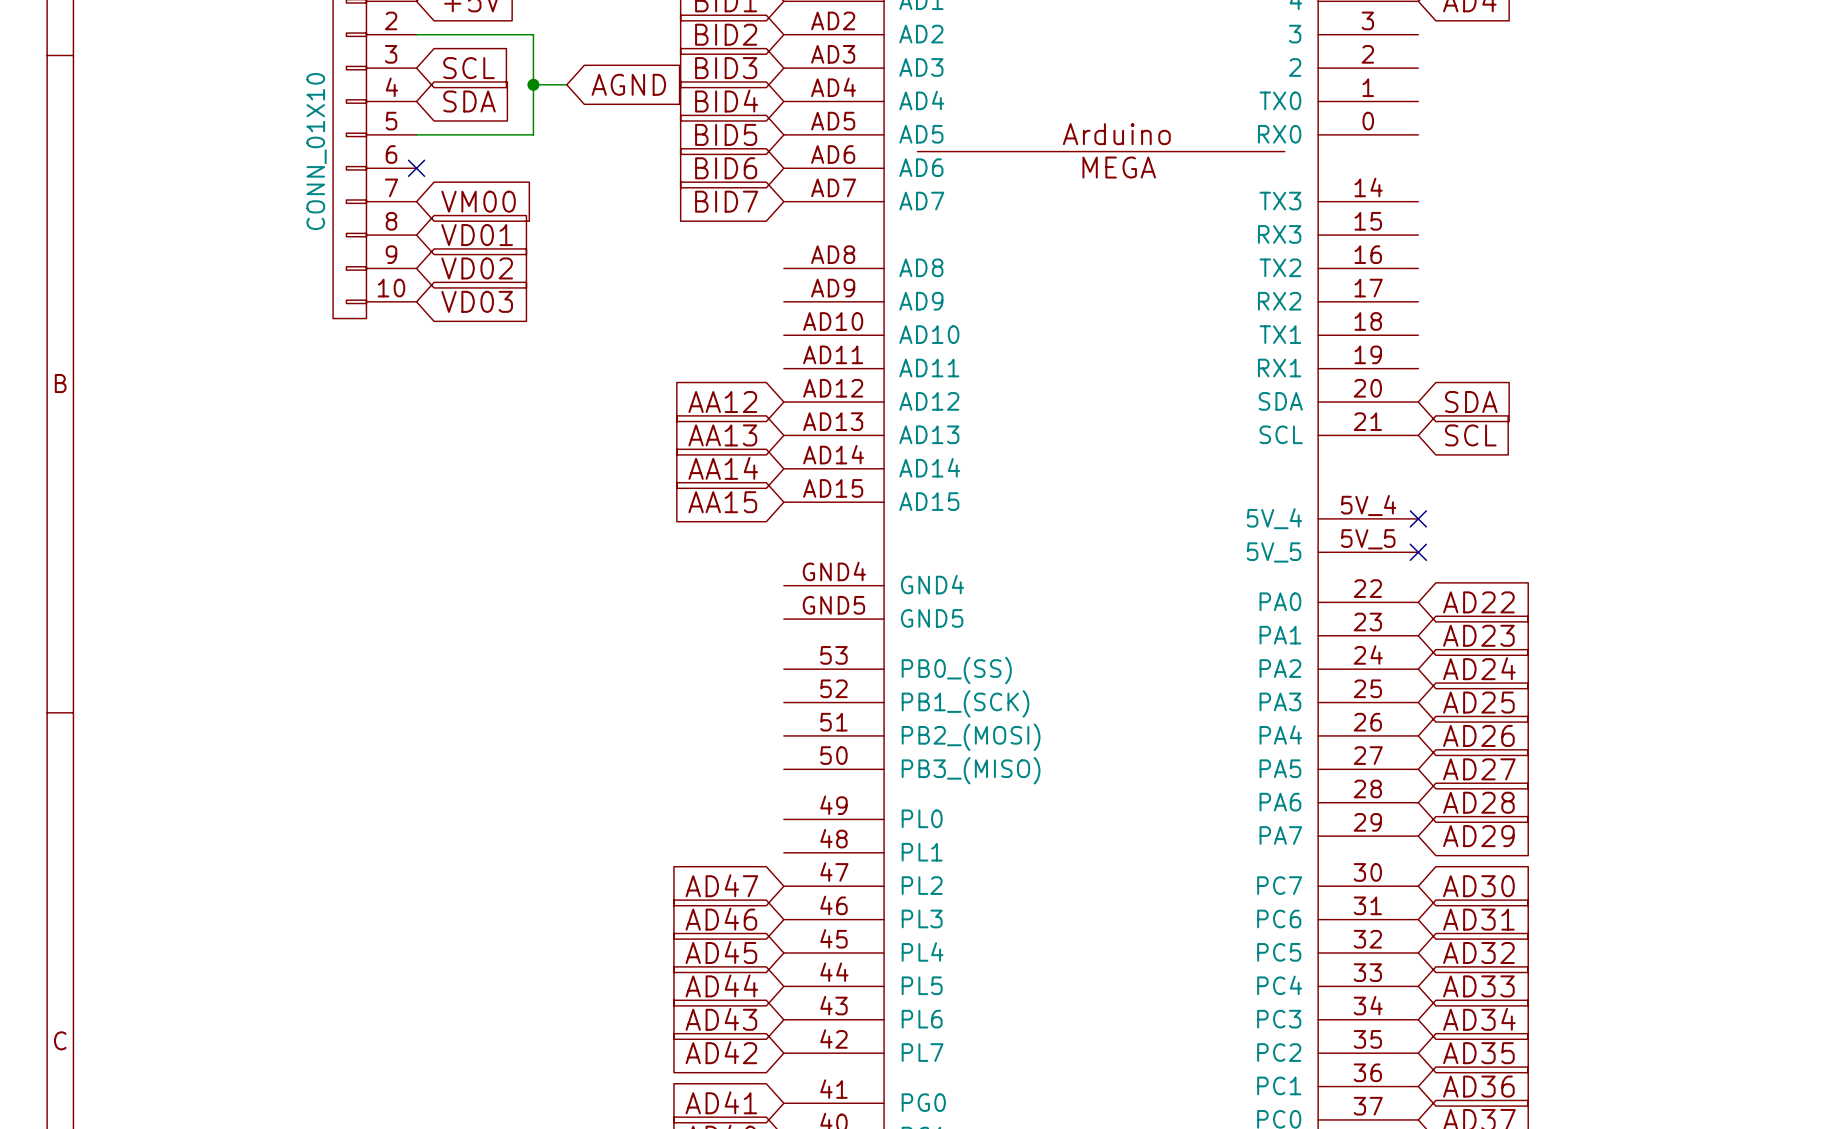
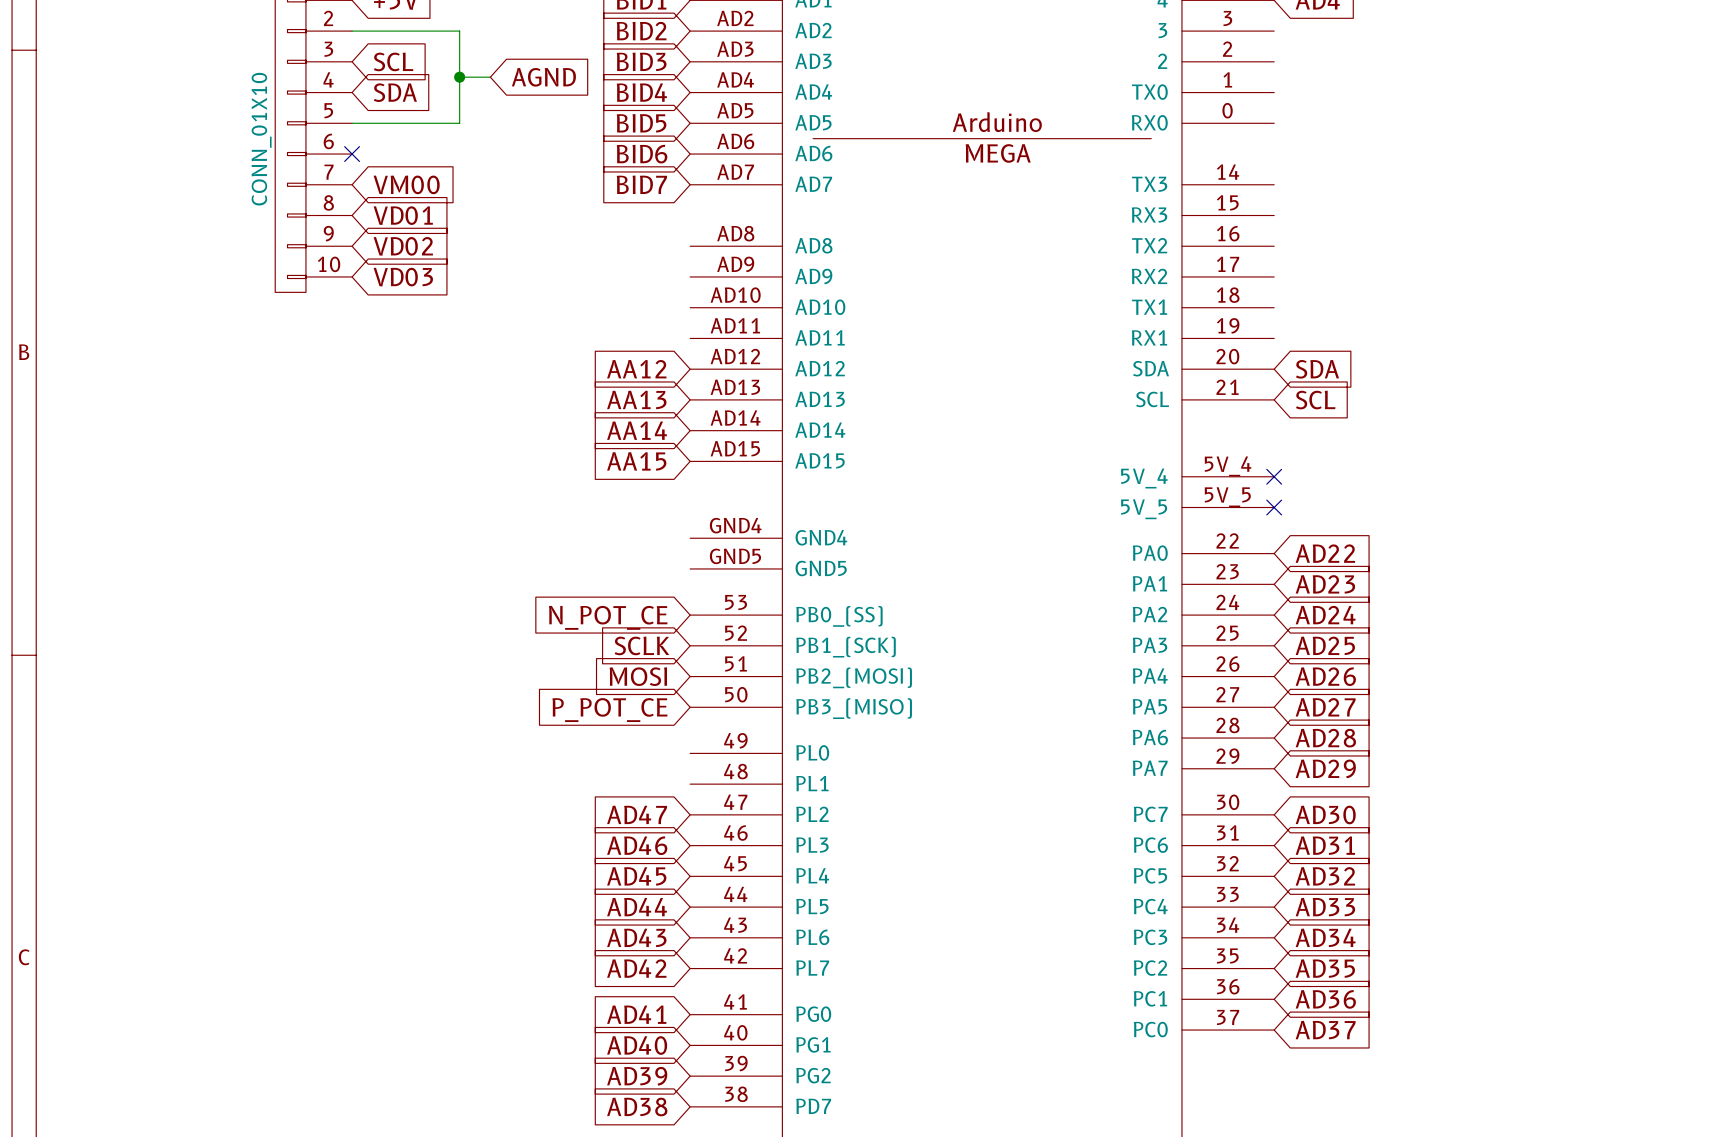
global label: none -> N_POT_CE (608, 617)
global label: none -> SCLK (641, 645)
global label: none -> MOSI (638, 676)
global label: none -> P_POT_CE (609, 710)

